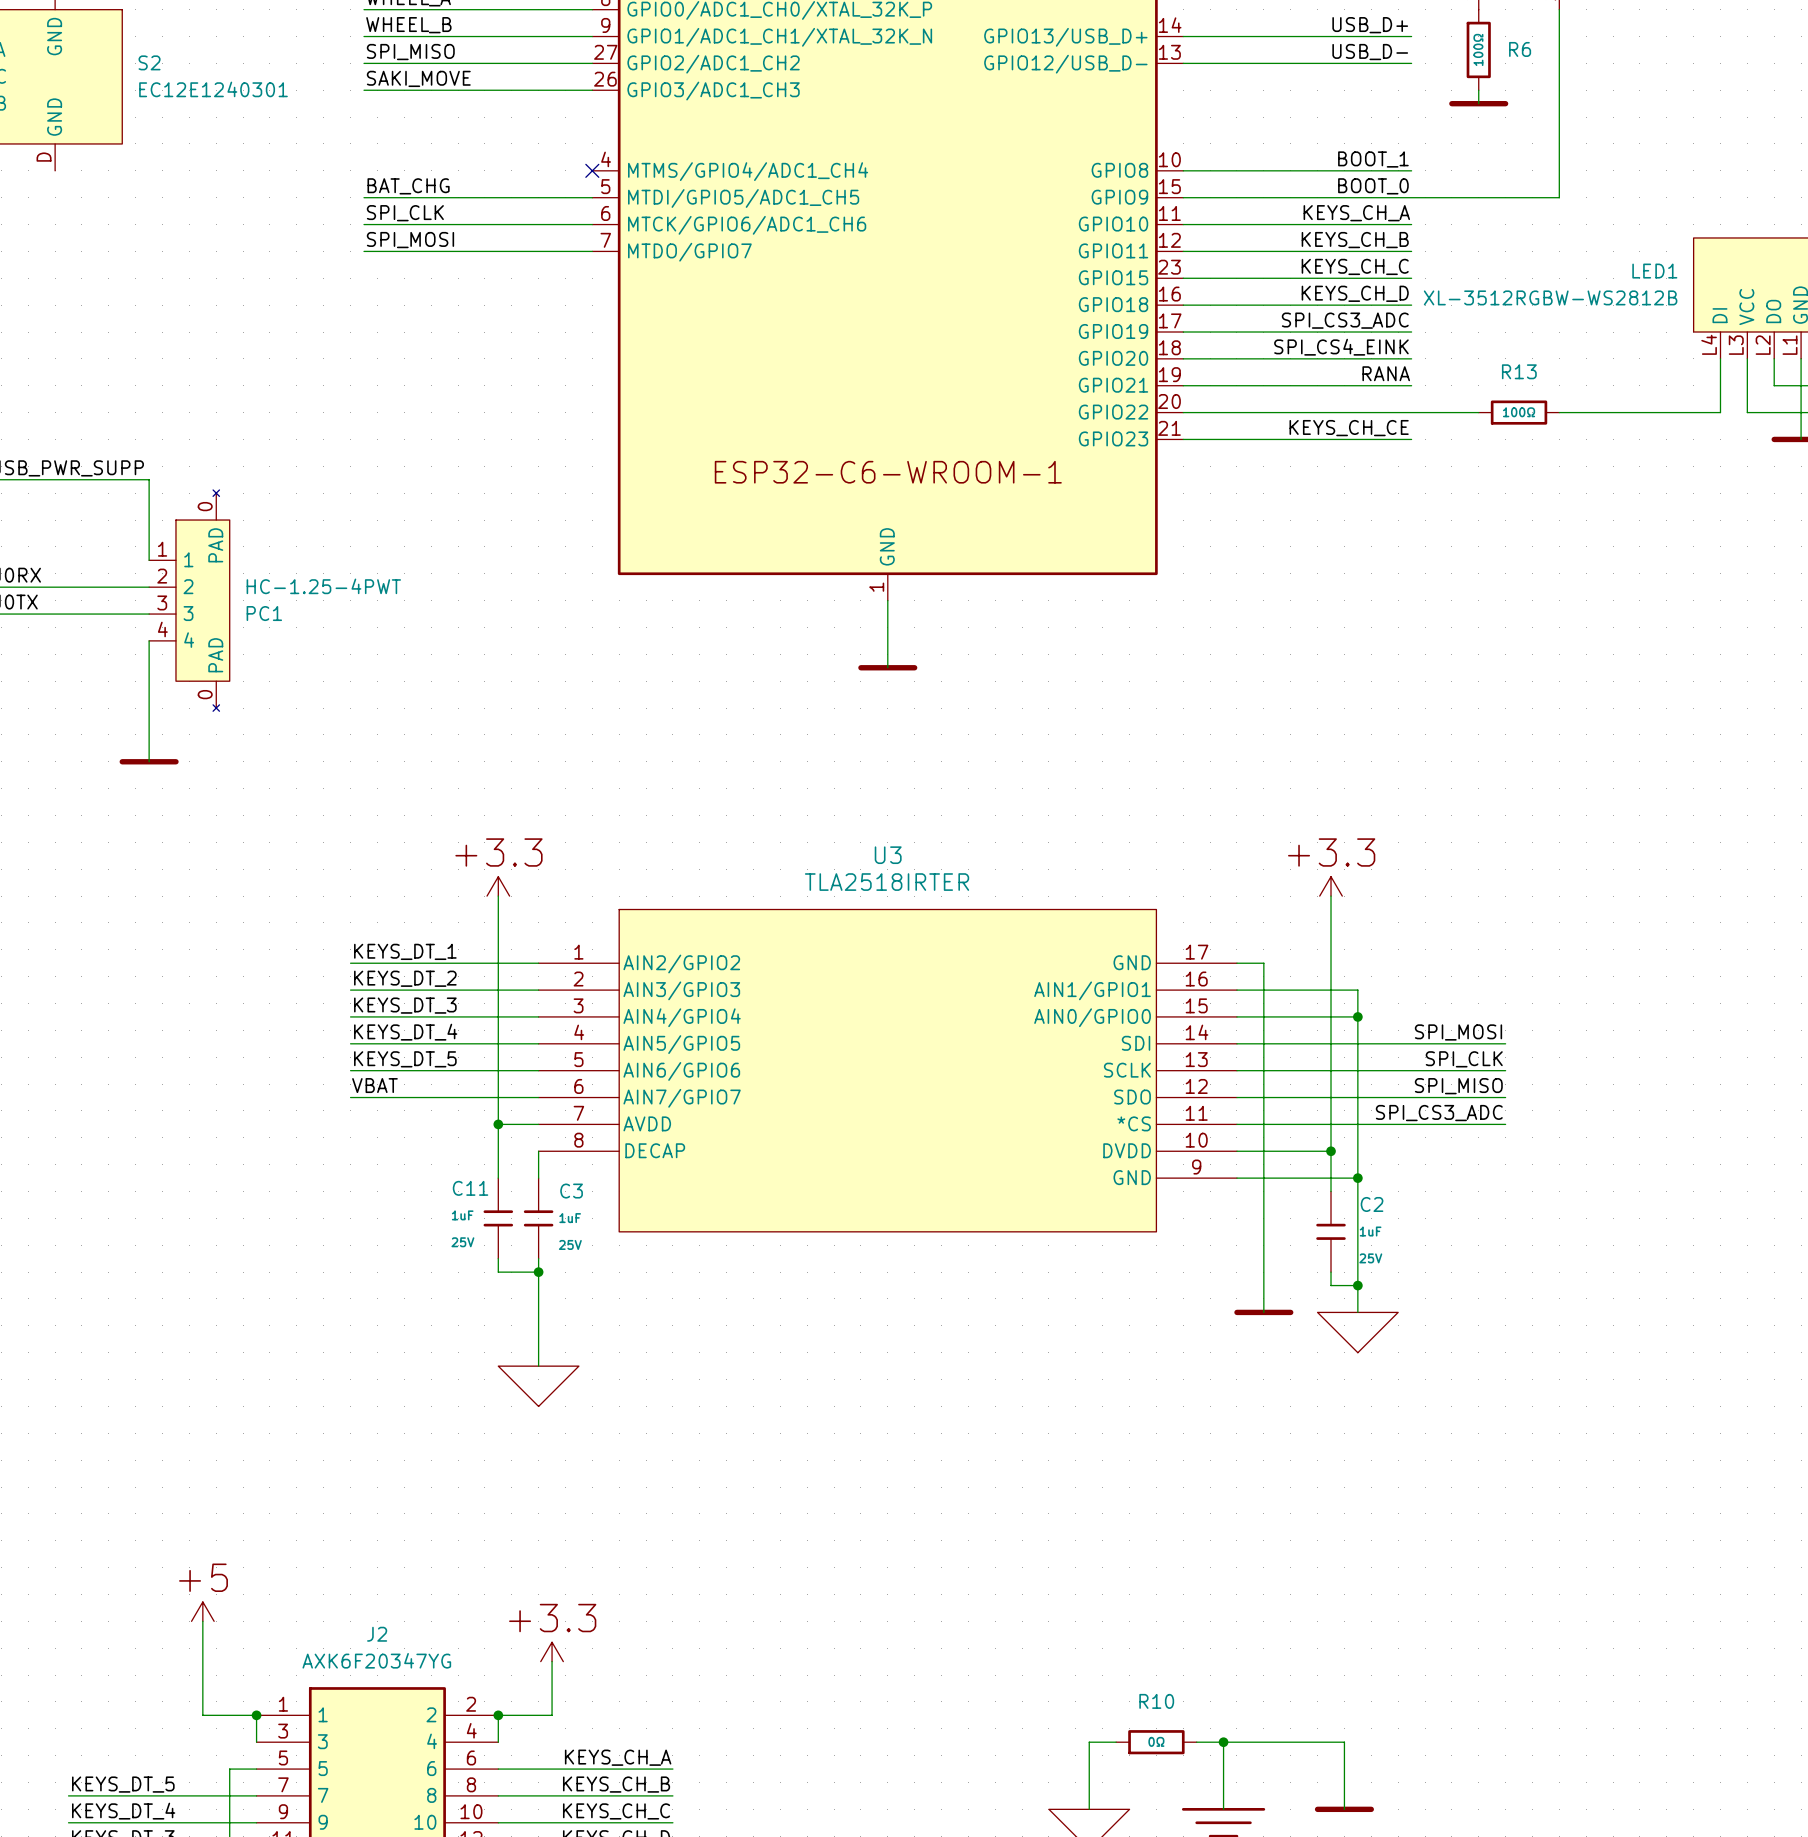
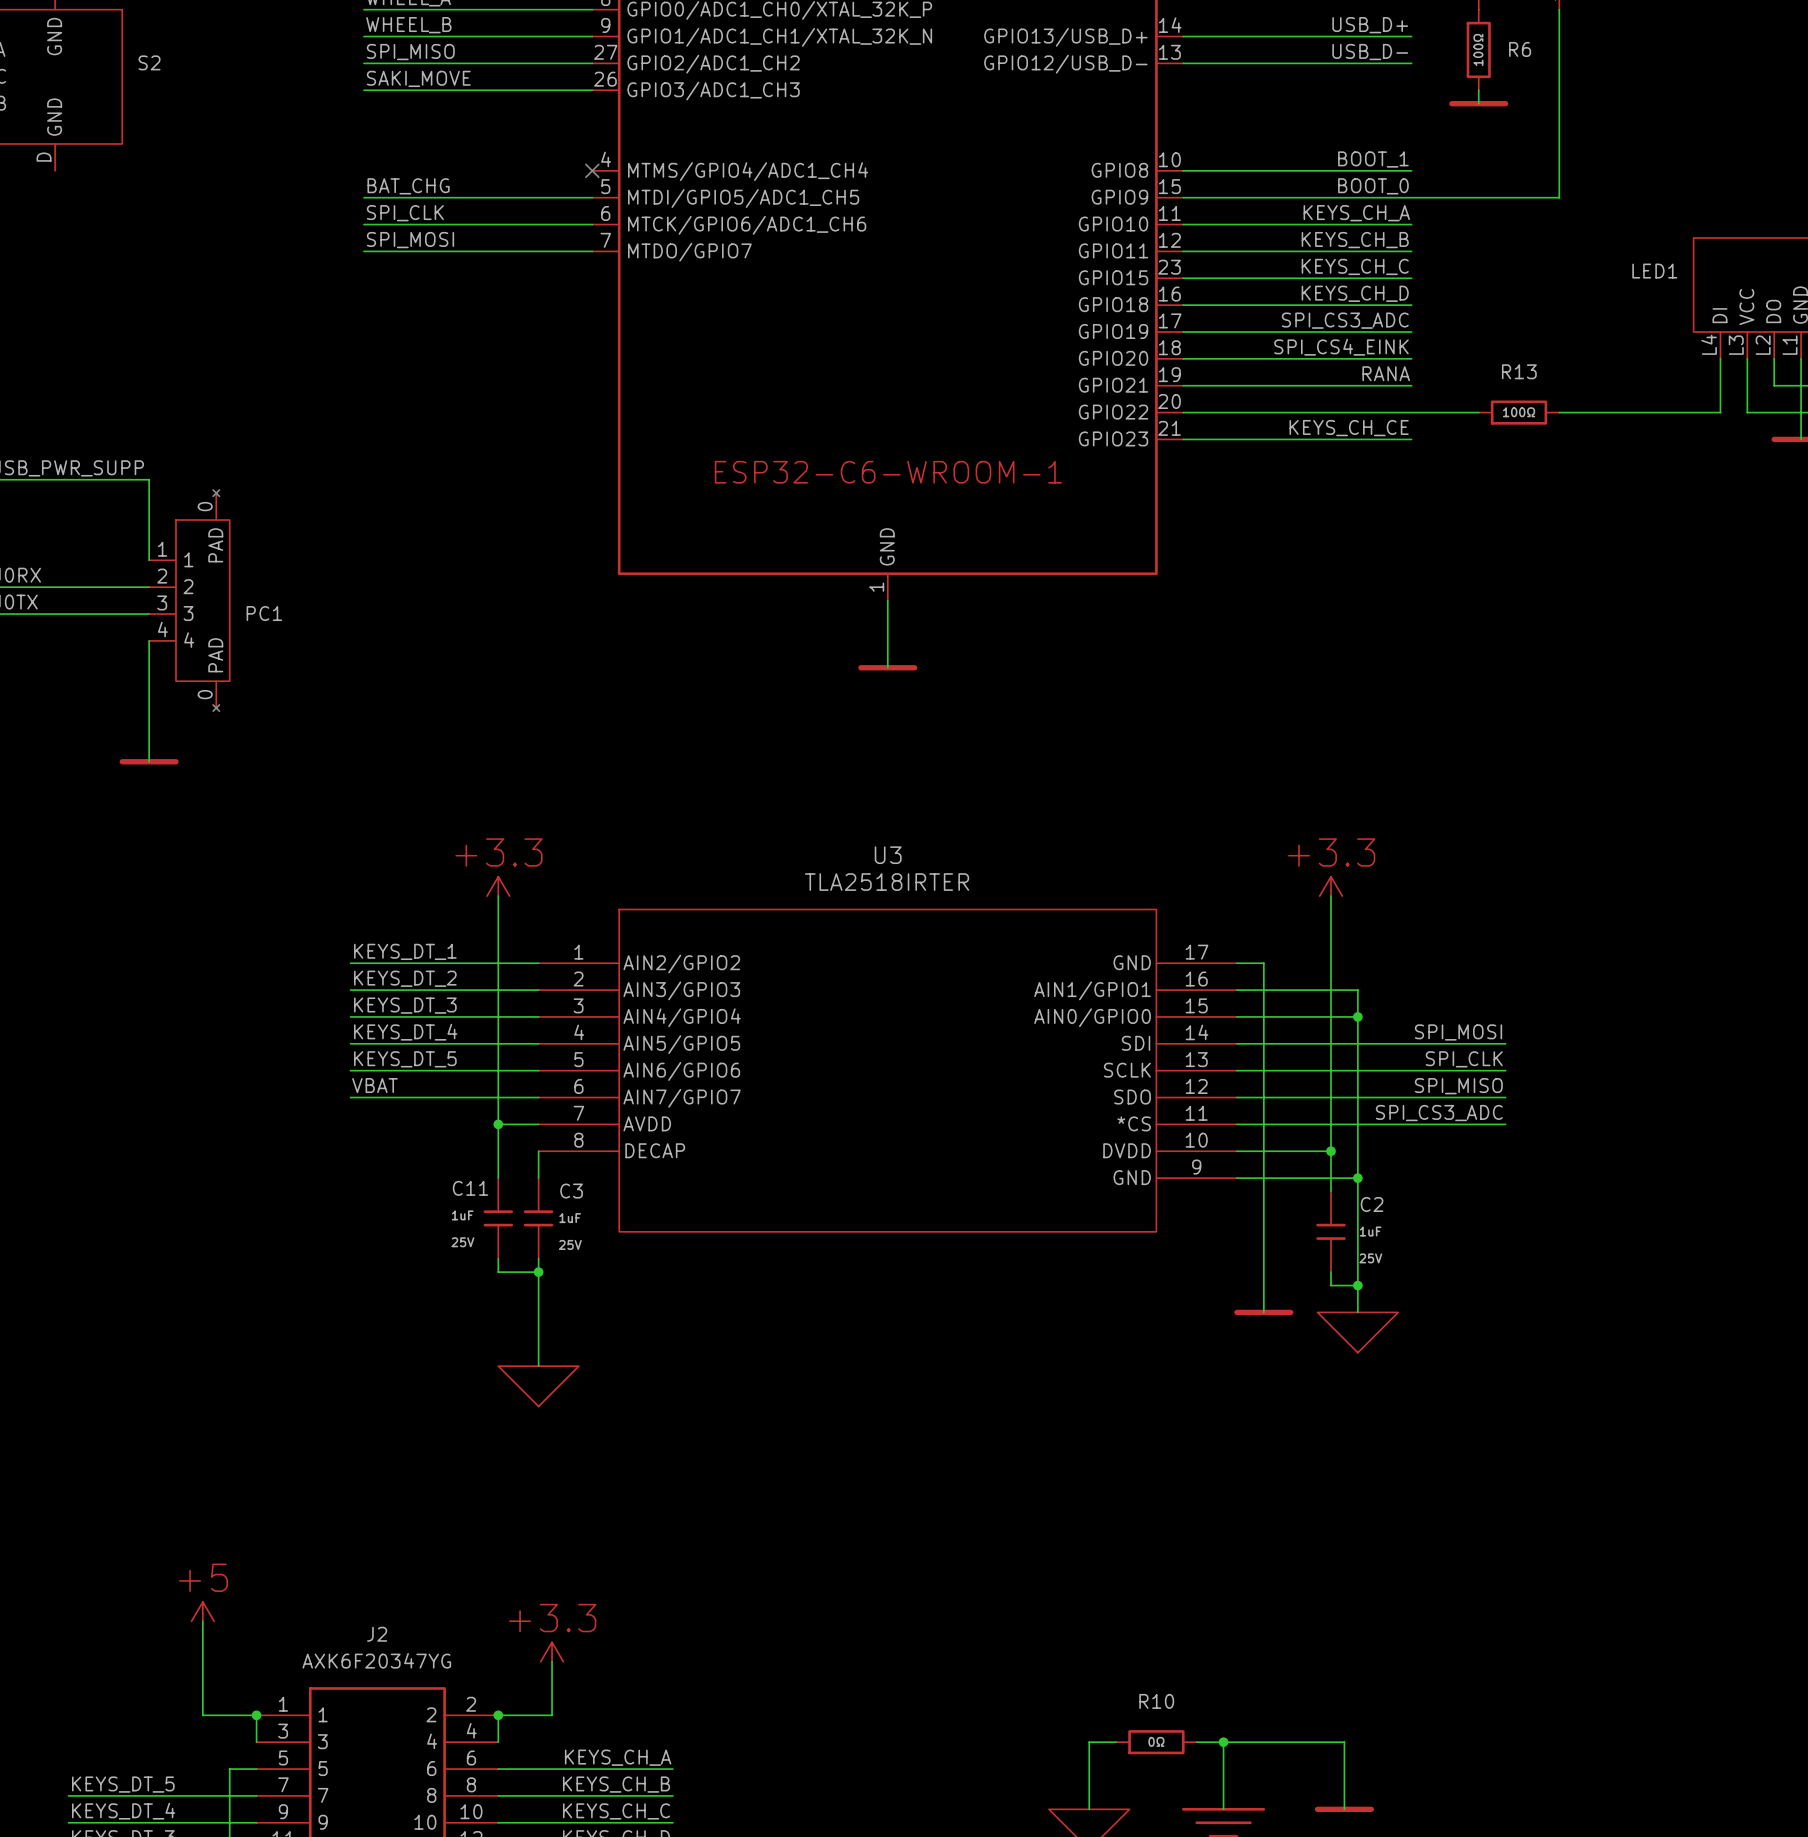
S2 value: EC12E1240301 (213, 89) -> none
LED1 value: XL-3512RGBW-WS2812B (1550, 297) -> none
PC1 value: HC-1.25-4PWT (323, 586) -> none

